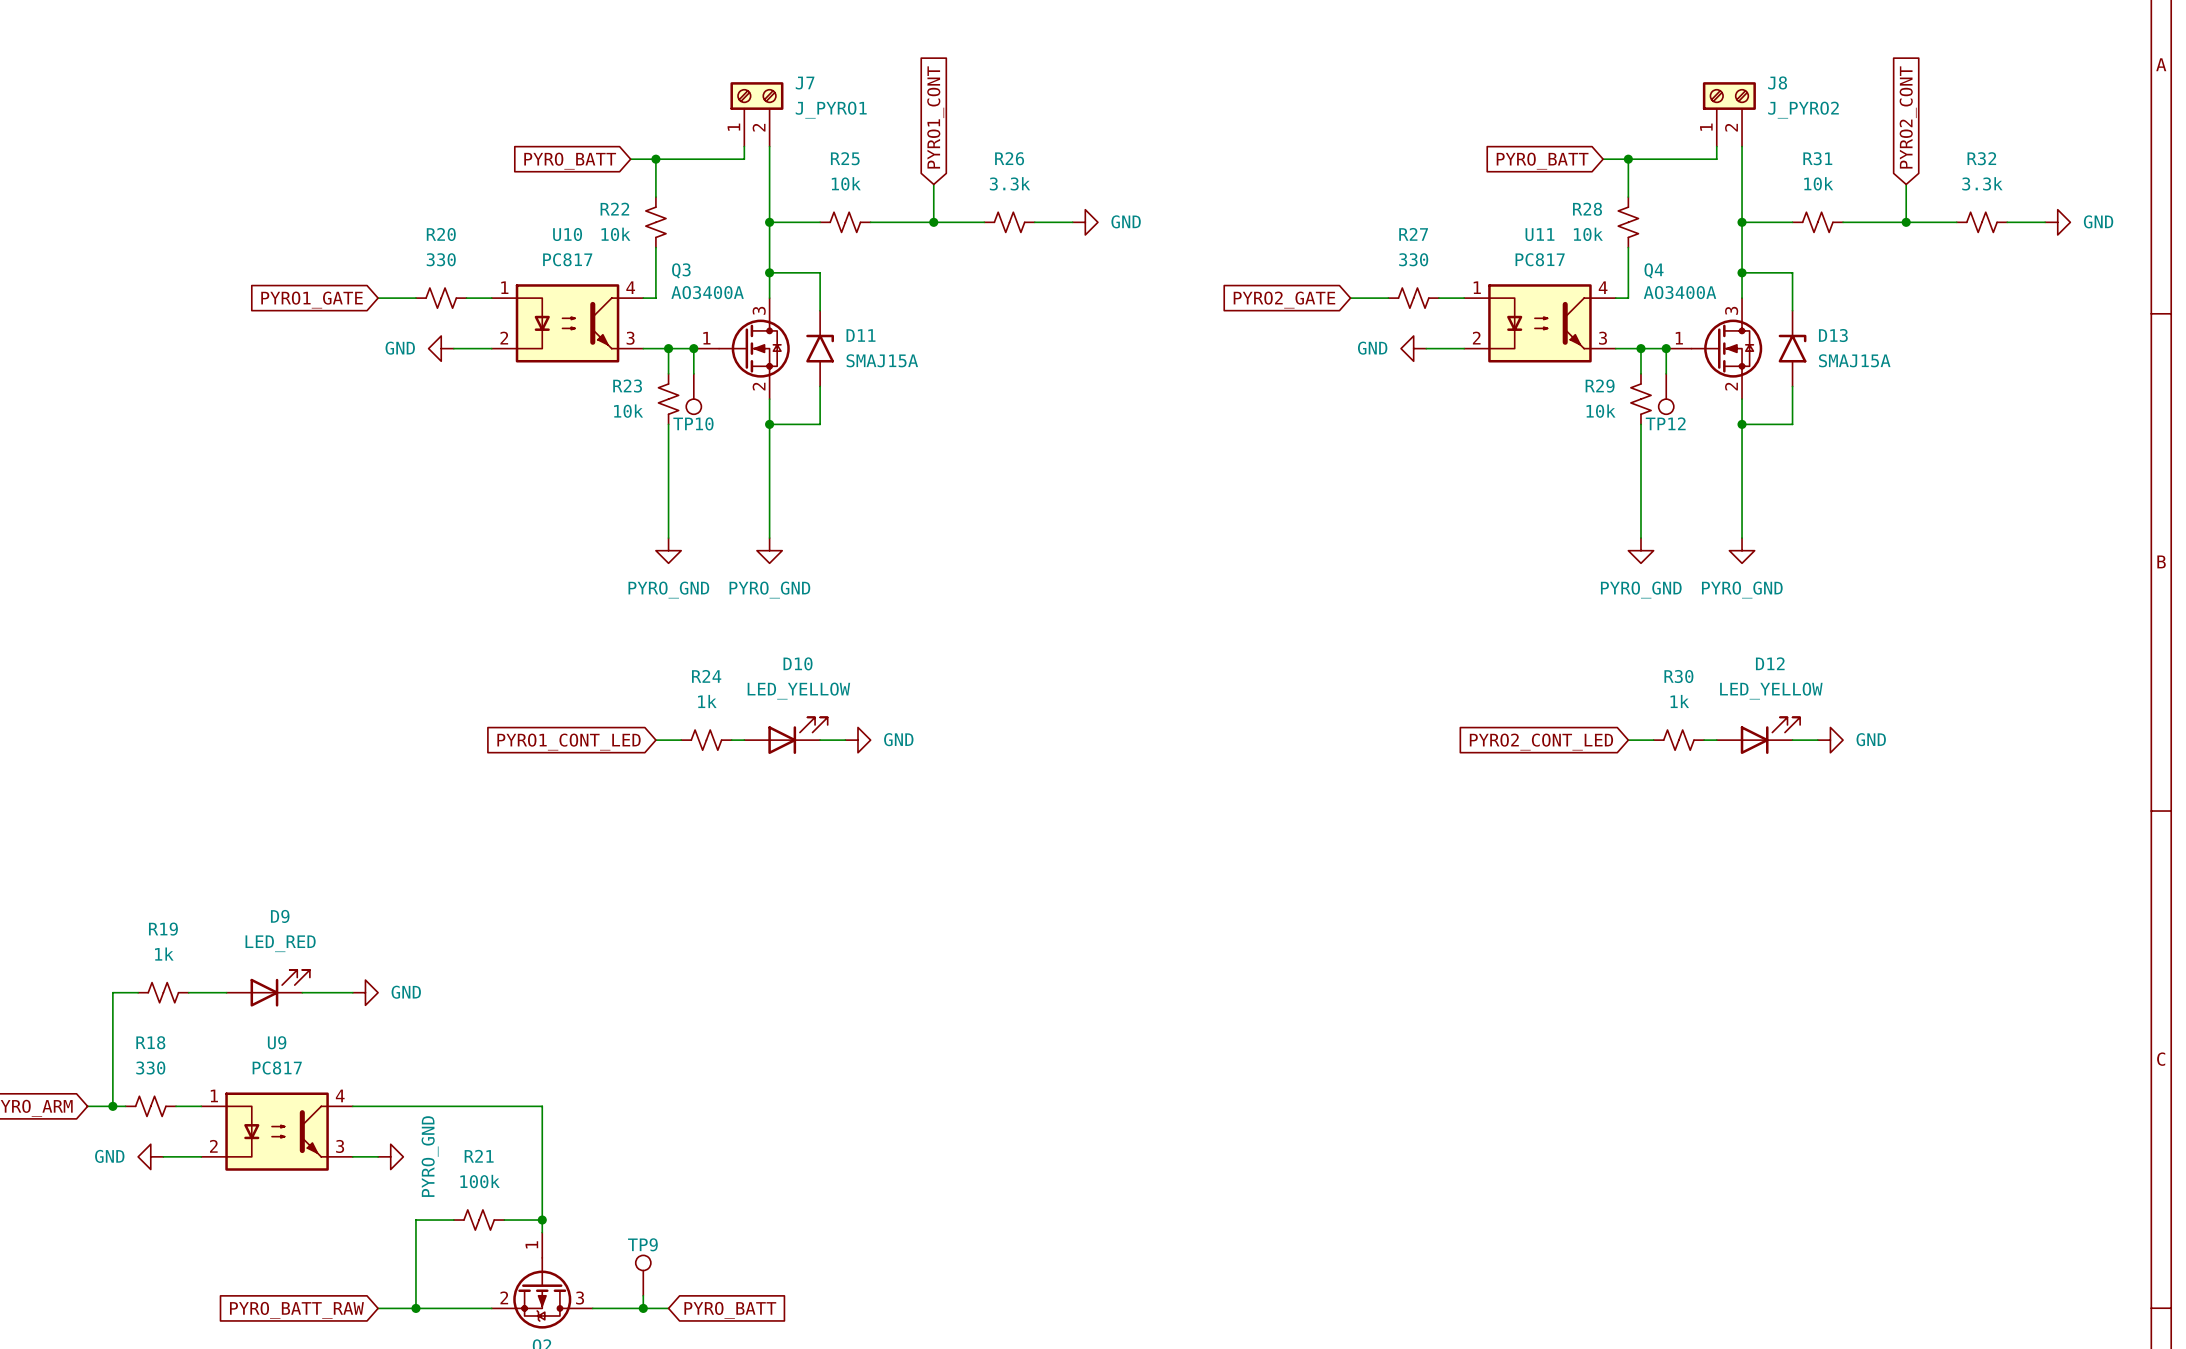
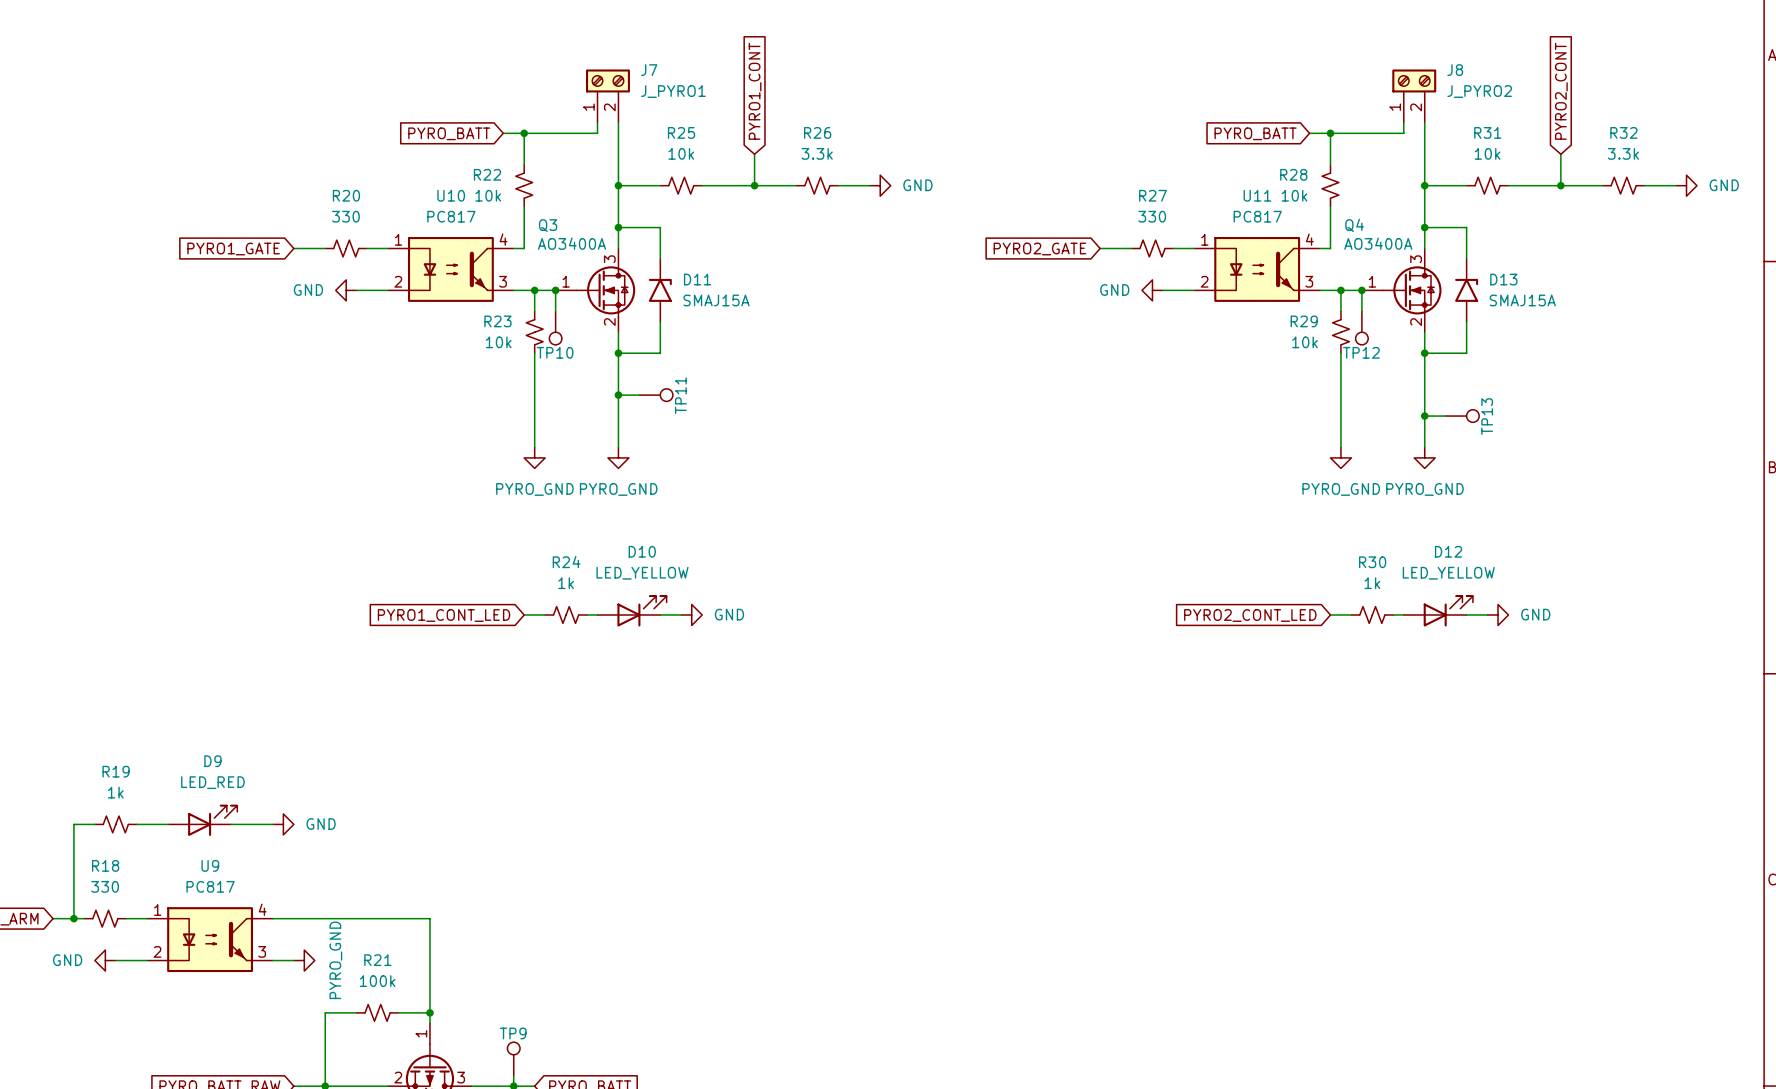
wire: none -> (618, 395) (639, 395)
junction: none -> (618, 395)
TP11: none -> (656, 395)
wire: none -> (1424, 416) (1445, 416)
junction: none -> (1424, 416)
TP13: none -> (1462, 416)

